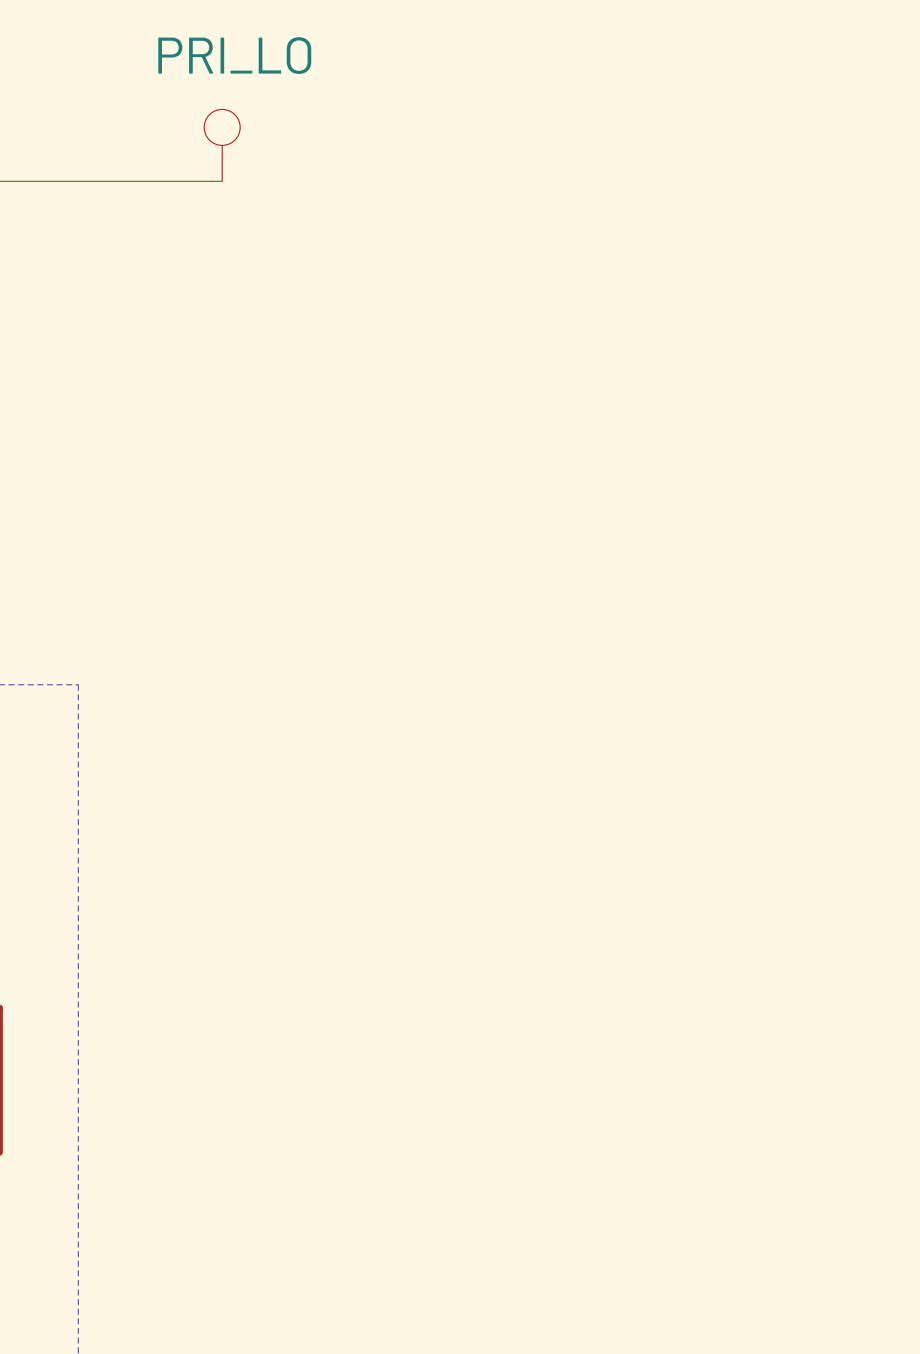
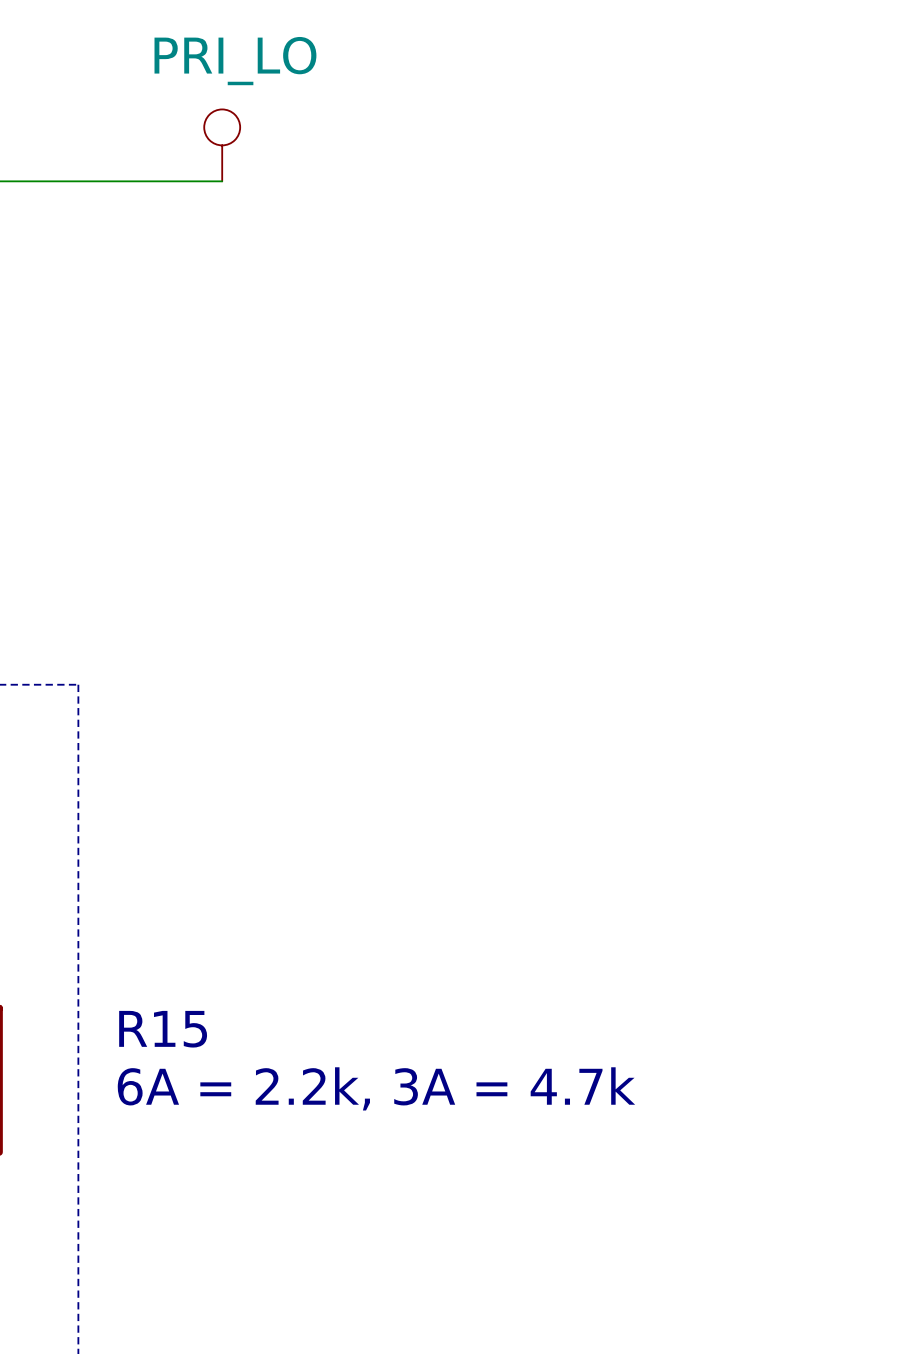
text: none -> R15 (163, 1029)
text: none -> 6A = 2.2k, 3A = 4.7k (376, 1088)

